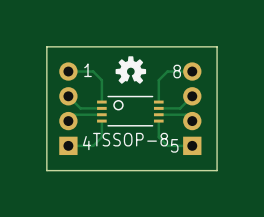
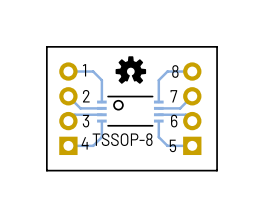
text: none -> 2 (86, 96)
text: none -> 7 (173, 96)
text: none -> 3 (86, 121)
text: none -> 6 (174, 121)

